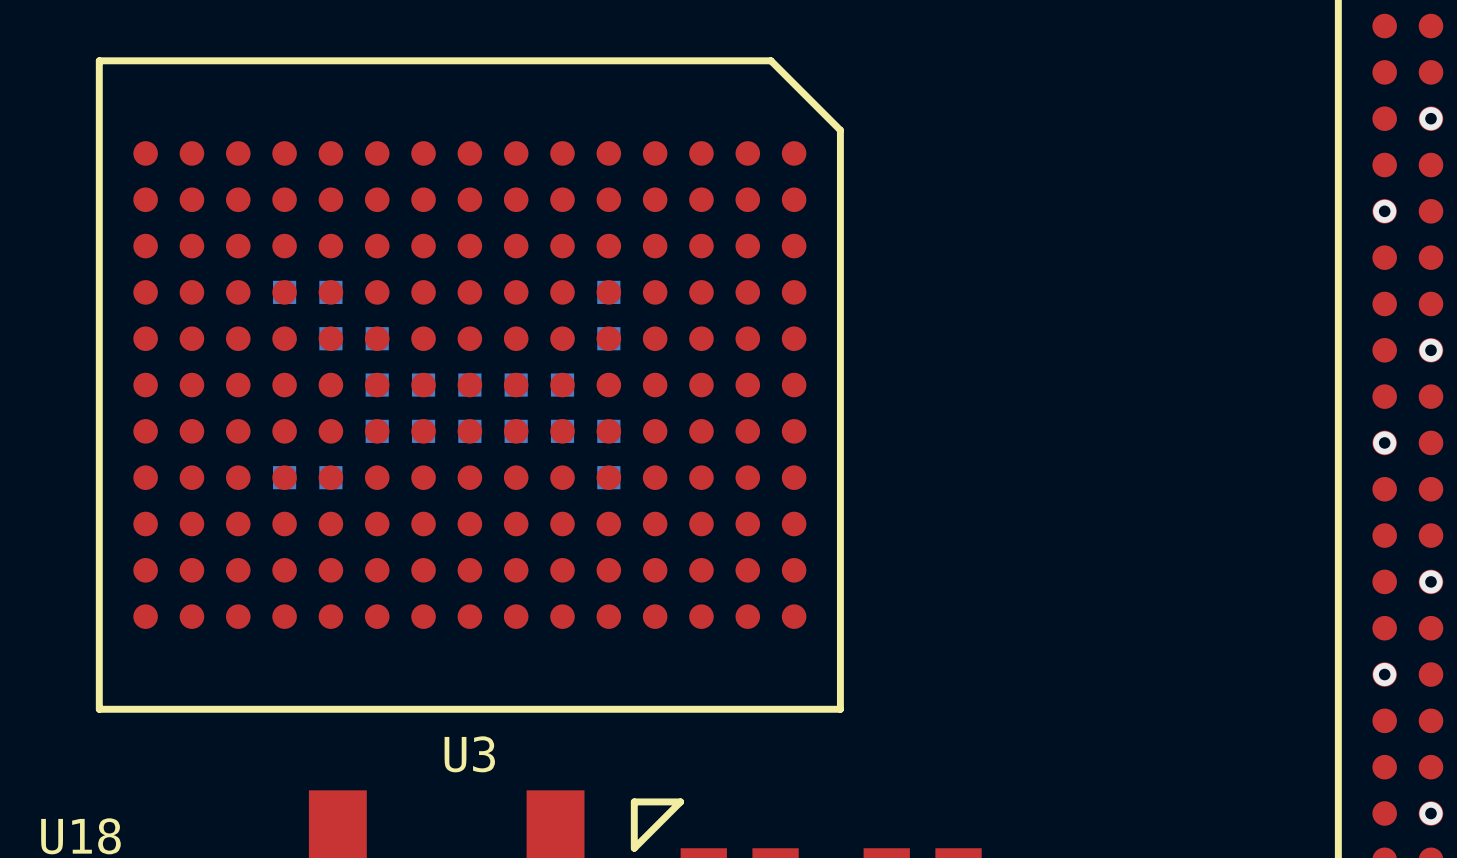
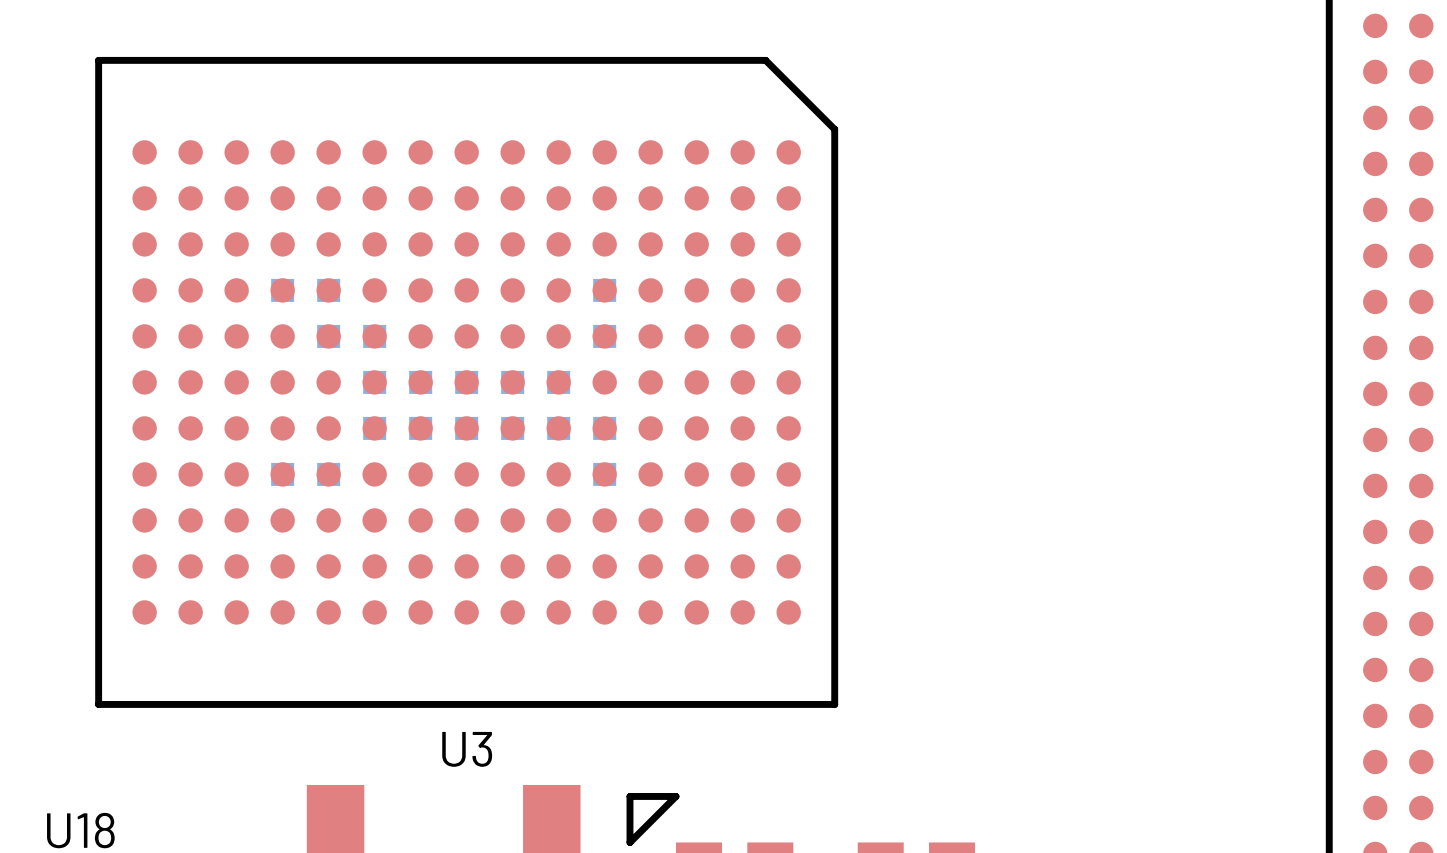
via: (1431, 118) -> none
via: (1384, 211) -> none
via: (1431, 350) -> none
via: (1384, 442) -> none
via: (1431, 581) -> none
via: (1384, 674) -> none
via: (1431, 813) -> none

